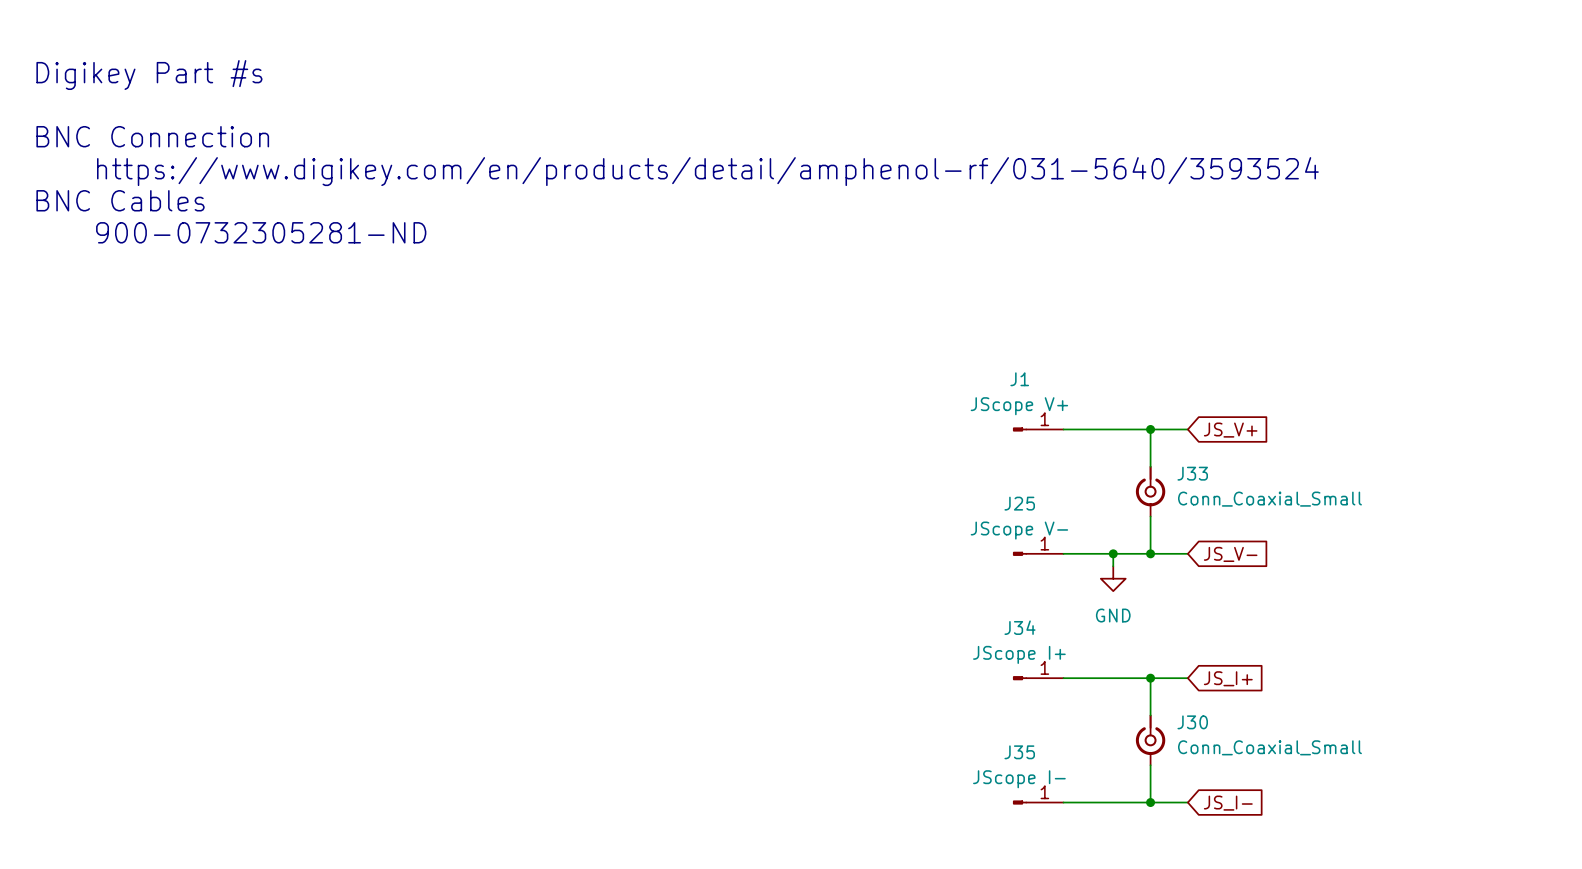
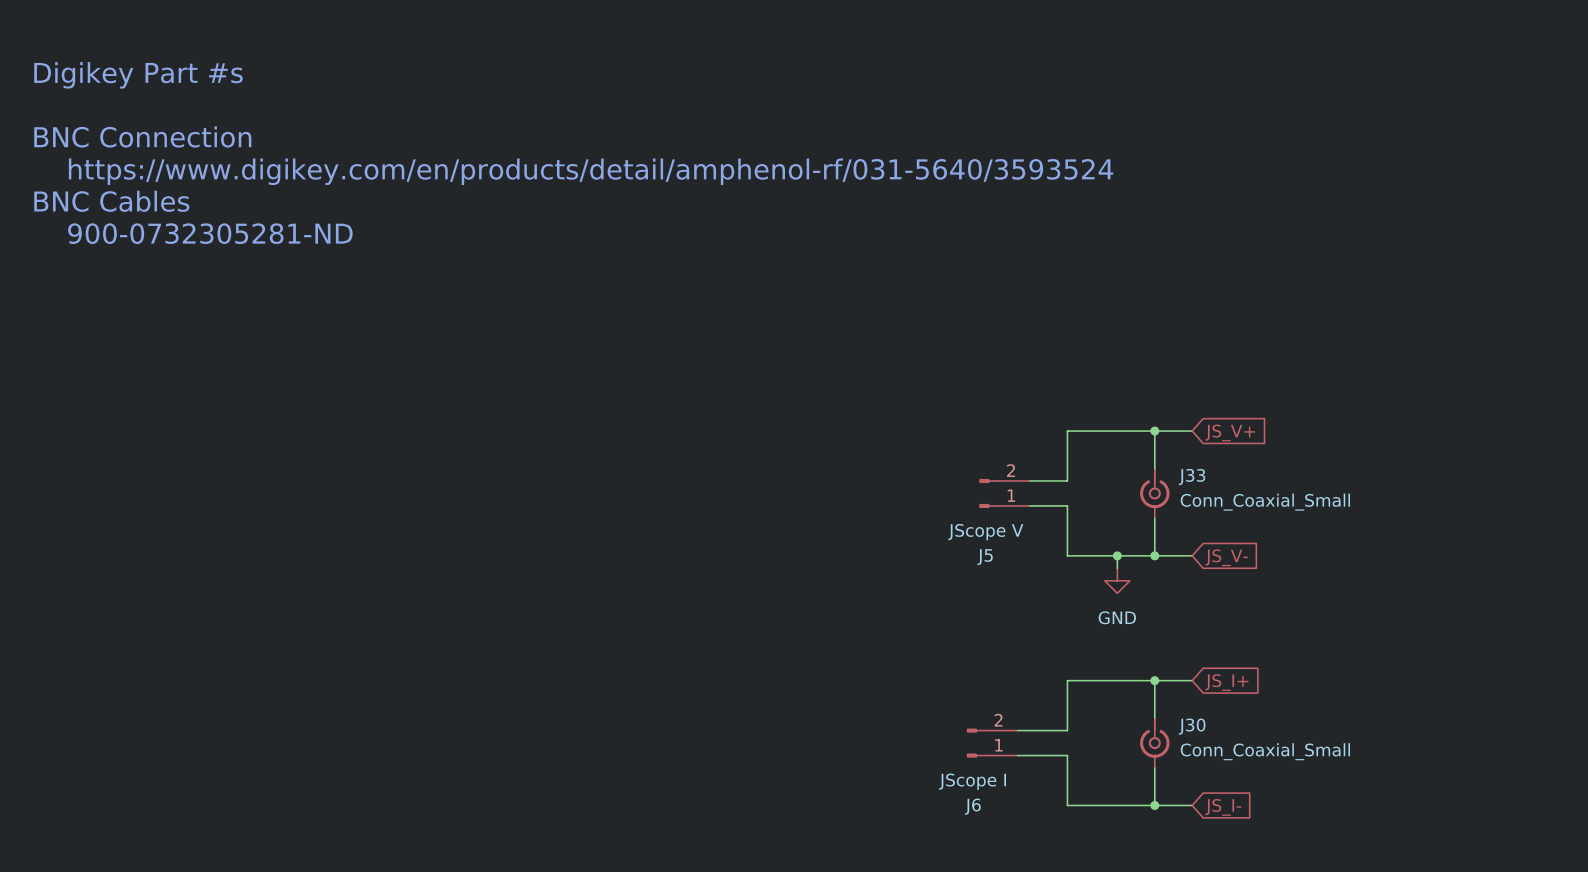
J1: JScope V+ (1038, 429) -> none
wire: none -> (1067, 431) (1067, 480) (1029, 480)
J5: none -> JScope V (1004, 493)
wire: none -> (1029, 505) (1067, 505) (1067, 555)
J25: JScope V- (1038, 553) -> none
J34: JScope I+ (1038, 678) -> none
wire: none -> (1067, 680) (1067, 730) (1017, 730)
J6: none -> JScope I (992, 743)
wire: none -> (1017, 755) (1067, 755) (1067, 805)
J35: JScope I- (1038, 802) -> none

